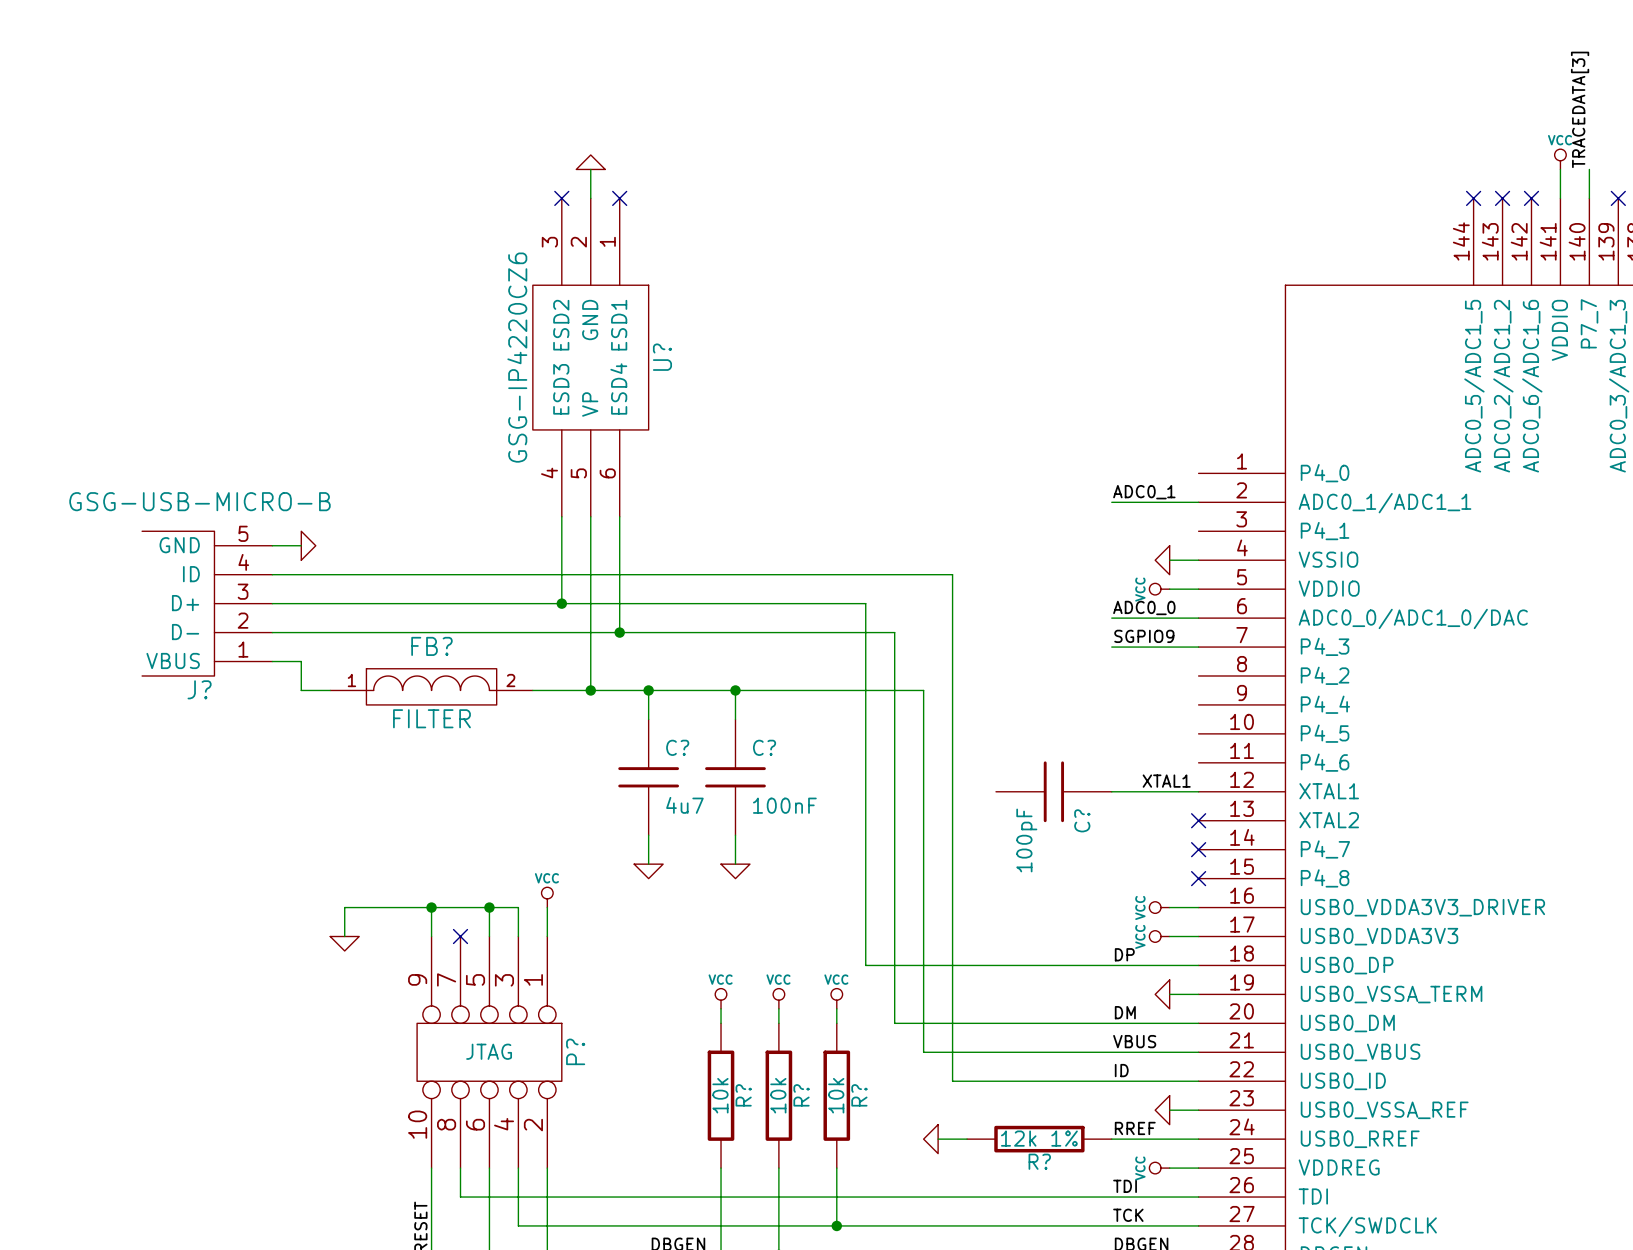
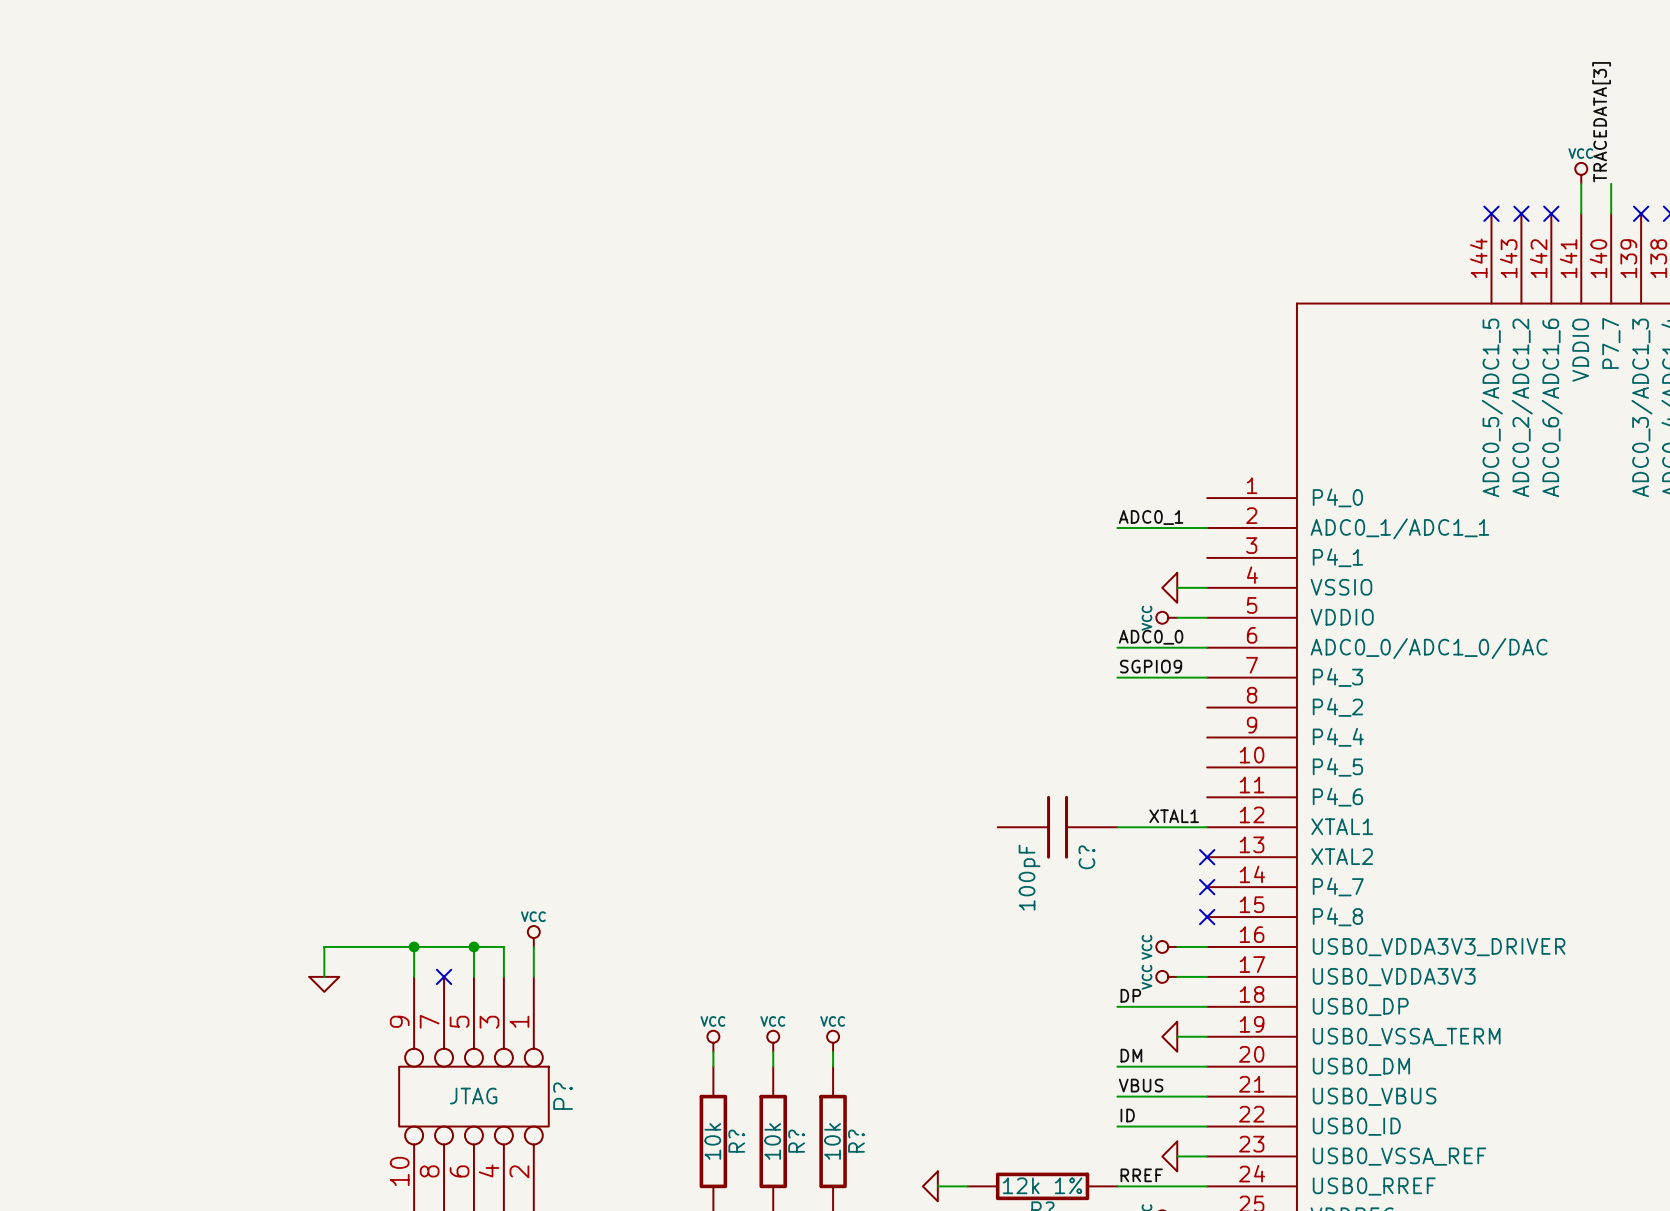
power symbol: (590, 162) -> none
wire: (590, 169) (590, 198) -> none
no-connect mark: (561, 198) -> none
no-connect mark: (619, 198) -> none
U?: GSG-IP4220CZ6 (590, 357) -> none
wire: (561, 516) (561, 603) -> none
wire: (590, 516) (590, 690) -> none
wire: (619, 516) (619, 632) -> none
wire: (272, 545) (301, 545) -> none
power symbol: (308, 545) -> none
wire: (272, 574) (952, 574) (952, 1081) (1111, 1081) -> none
J?: GSG-USB-MICRO-B (207, 603) -> none
wire: (272, 603) (865, 603) (865, 965) (1111, 965) -> none
junction: (561, 603) -> none
wire: (272, 632) (894, 632) (894, 1023) (1111, 1023) -> none
junction: (619, 632) -> none
wire: (272, 661) (301, 661) (301, 690) (330, 690) -> none
FB?: FILTER (431, 686) -> none
wire: (532, 690) (923, 690) (923, 1052) (1111, 1052) -> none
junction: (590, 690) -> none
wire: (648, 690) (648, 719) -> none
junction: (648, 690) -> none
wire: (735, 690) (735, 719) -> none
junction: (735, 690) -> none
C?: 4u7 (648, 777) -> none
C?: 100nF (735, 777) -> none
wire: (648, 835) (648, 864) -> none
wire: (735, 835) (735, 864) -> none
power symbol: (648, 871) -> none
power symbol: (735, 871) -> none

